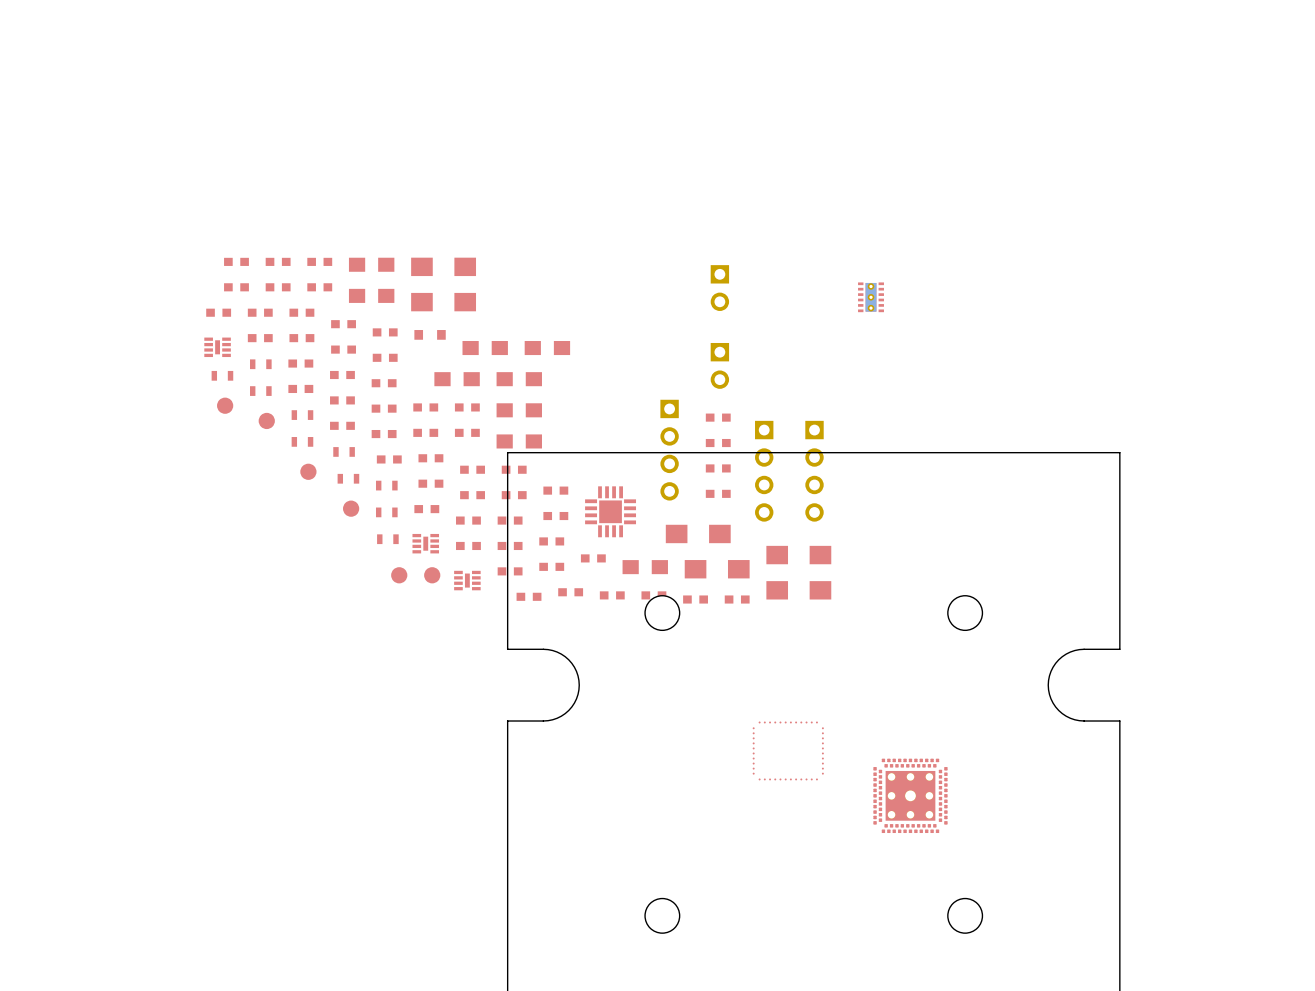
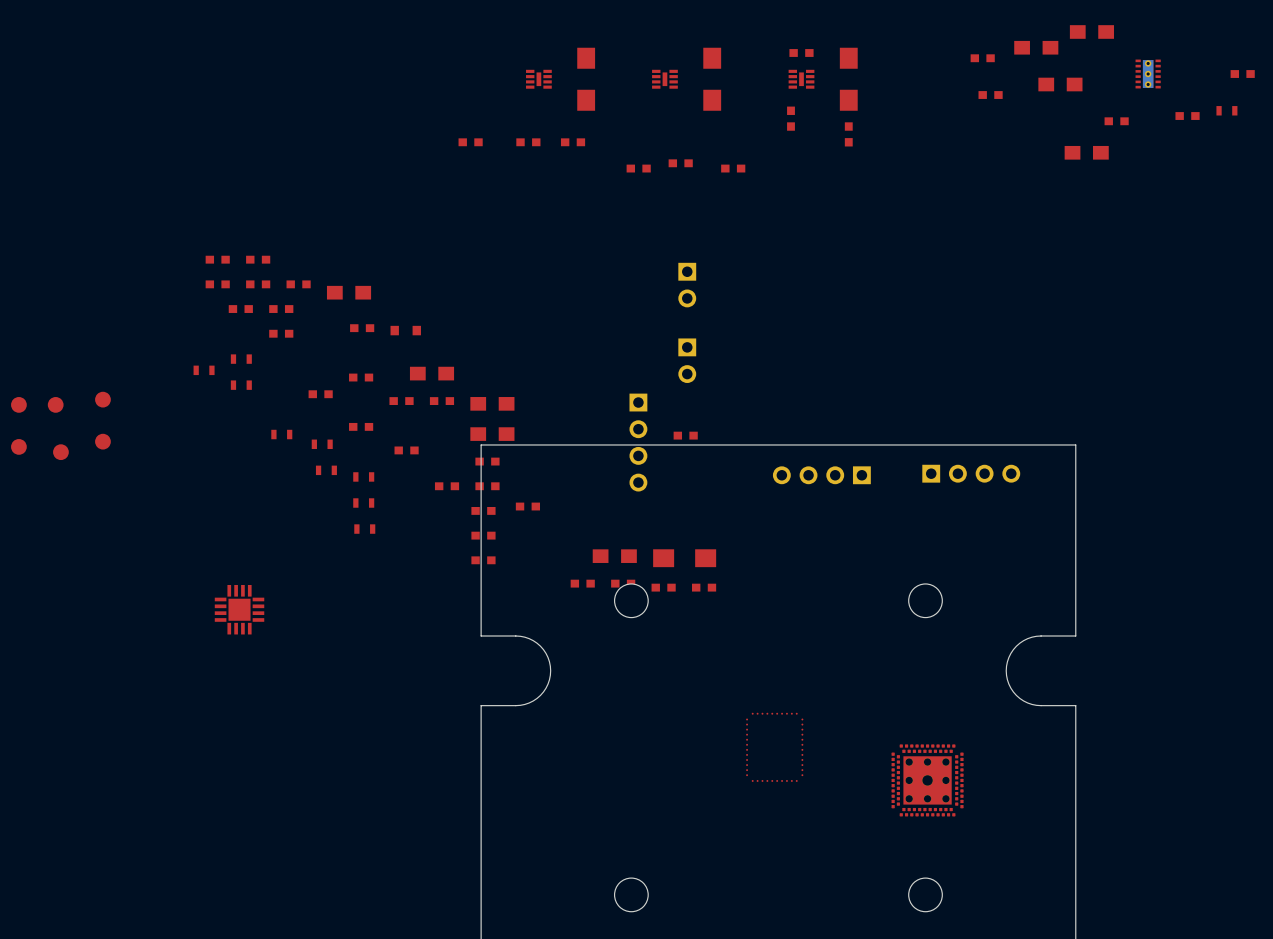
part: none -> (1091, 31)
part: none -> (1036, 47)
part: none -> (801, 52)
part: none -> (982, 58)
part: none -> (1148, 74)
part: none -> (1242, 74)
part: none -> (538, 79)
part: none -> (586, 79)
part: none -> (664, 79)
part: none -> (712, 79)
part: none -> (801, 79)
part: none -> (848, 79)
part: none -> (1060, 84)
part: none -> (990, 95)
part: none -> (1226, 110)
part: none -> (1187, 116)
part: none -> (791, 118)
part: none -> (1116, 121)
part: none -> (848, 134)
part: none -> (470, 142)
part: none -> (528, 142)
part: none -> (573, 142)
part: none -> (1086, 152)
part: none -> (680, 163)
part: none -> (638, 168)
part: none -> (733, 168)
part: (319, 261) -> none
part: (371, 264) -> none
part: (443, 266) -> none
part: (871, 297) -> none
part: (443, 302) -> none
part: (218, 312) -> none
part: (343, 324) -> none
part: (260, 338) -> none
part: (217, 347) -> none
part: (485, 348) -> none
part: (547, 348) -> none
part: (343, 349) -> none
part: (385, 357) -> none
part: (300, 363) -> none
part: (342, 375) -> none
part: (519, 379) -> none
part: (300, 388) -> none
part: none -> (102, 399)
part: (225, 405) -> none
part: (384, 408) -> none
part: none -> (18, 404)
part: none -> (55, 404)
part: (302, 415) -> none
part: (718, 417) -> none
part: (266, 420) -> none
part: (342, 425) -> none
part: (425, 432) -> none
part: (467, 432) -> none
part: none -> (102, 441)
part: none -> (18, 446)
part: (389, 459) -> none
part: none -> (60, 452)
part: (718, 468) -> none
part: (472, 469) -> none
part: (308, 471) -> none
part: (764, 471) -> none
part rotation: 0° (814, 471) -> 90° clockwise (821, 475)
part: none -> (971, 473)
part: (430, 483) -> none
part: (555, 490) -> none
part: (718, 493) -> none
part: (351, 508) -> none
part: (426, 509) -> none
part: (610, 511) -> none
part: (468, 520) -> none
part: (698, 533) -> none
part: (551, 541) -> none
part: (425, 543) -> none
part: (468, 545) -> none
part: (798, 555) -> none
part: (593, 558) -> none
part: (551, 566) -> none
part: (399, 575) -> none
part: (432, 575) -> none
part: (467, 580) -> none
part: (798, 590) -> none
part: (570, 592) -> none
part: (529, 596) -> none
part: none -> (239, 609)
part rotation: 0° (788, 750) -> 90° clockwise (774, 747)
part position: (910, 795) -> (927, 780)

